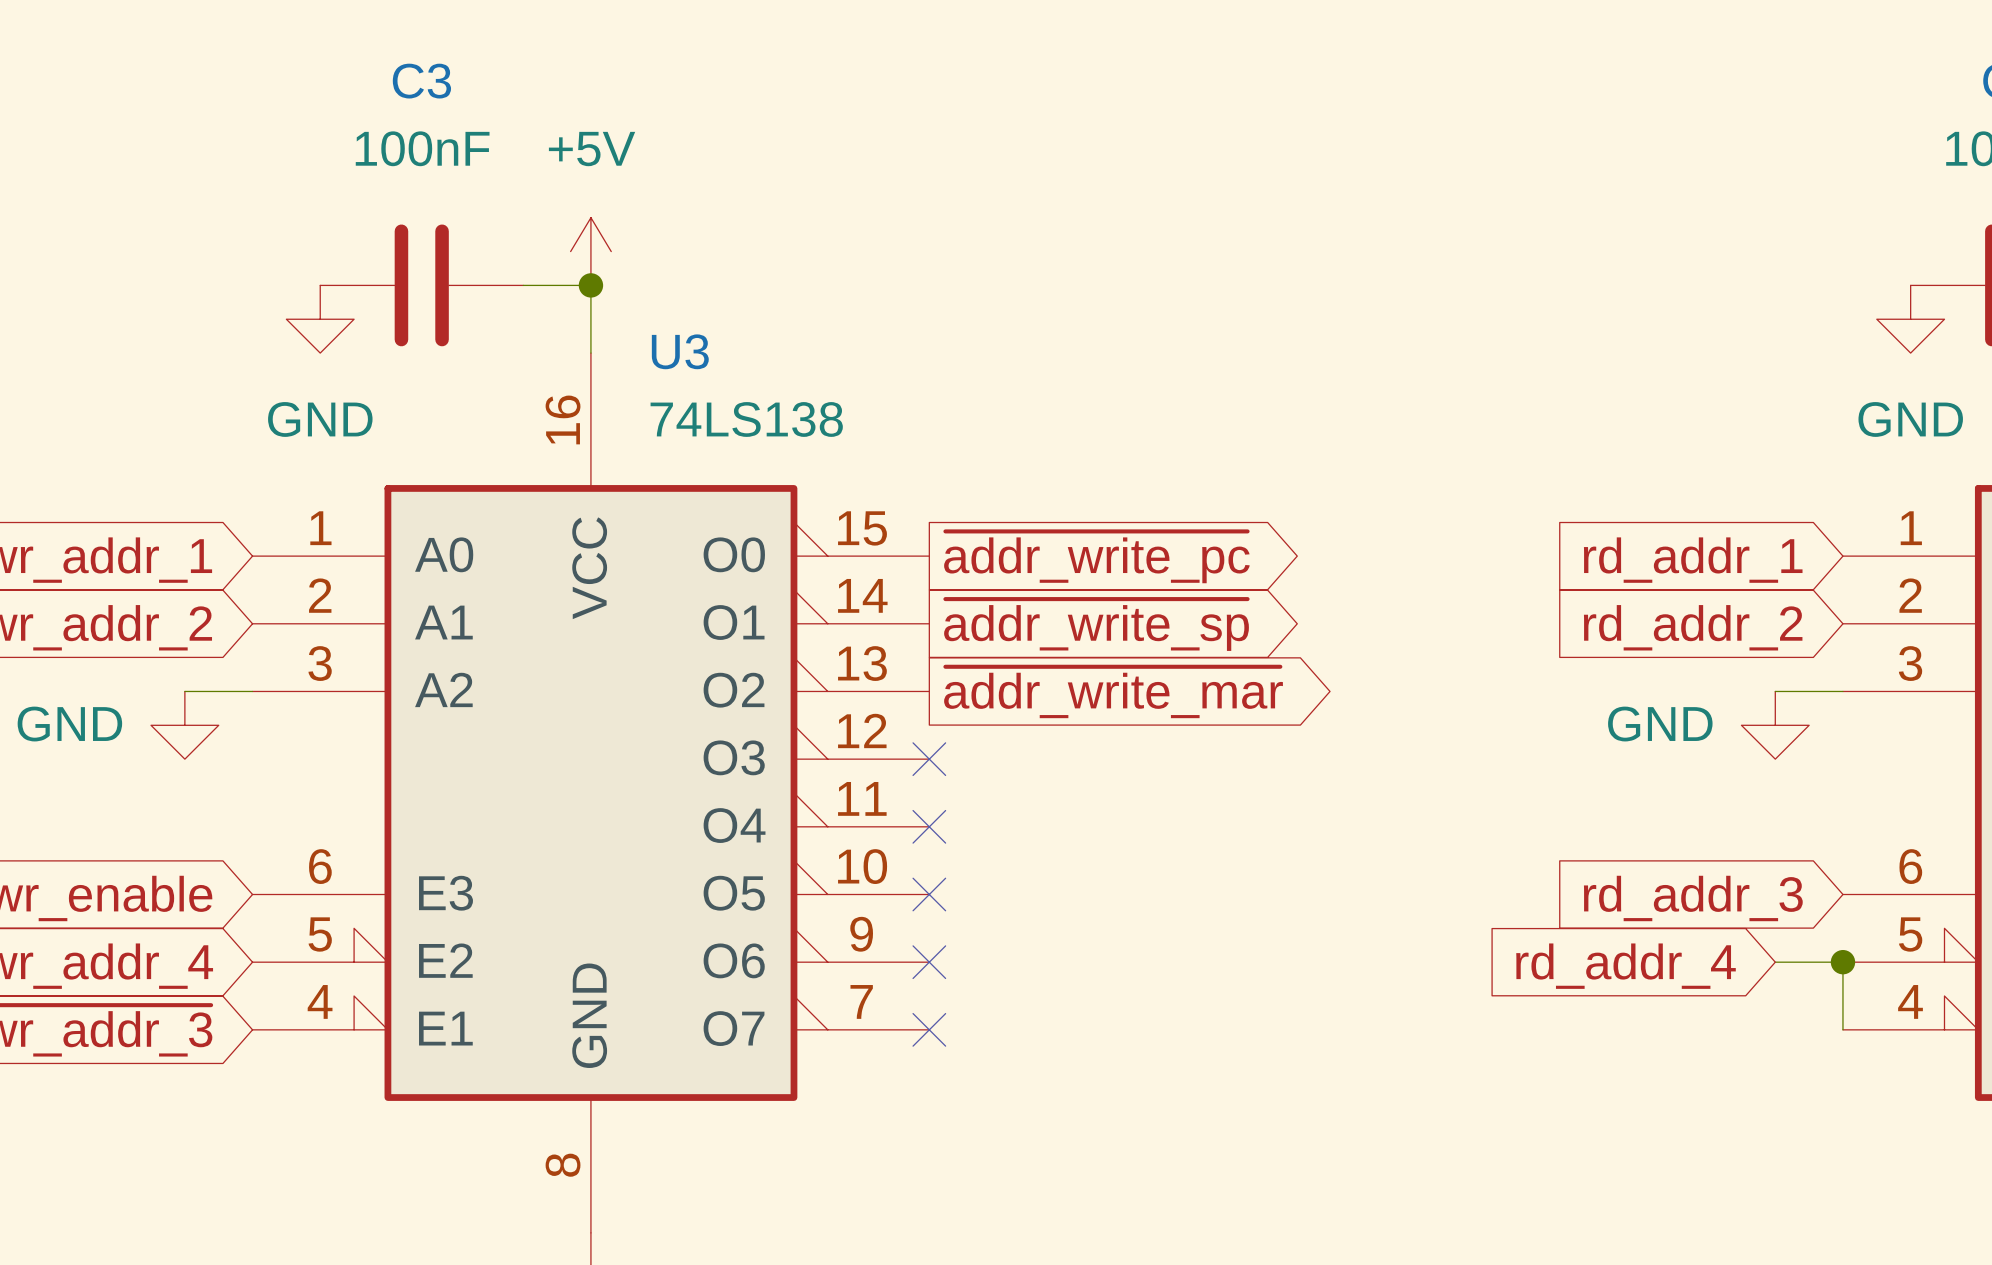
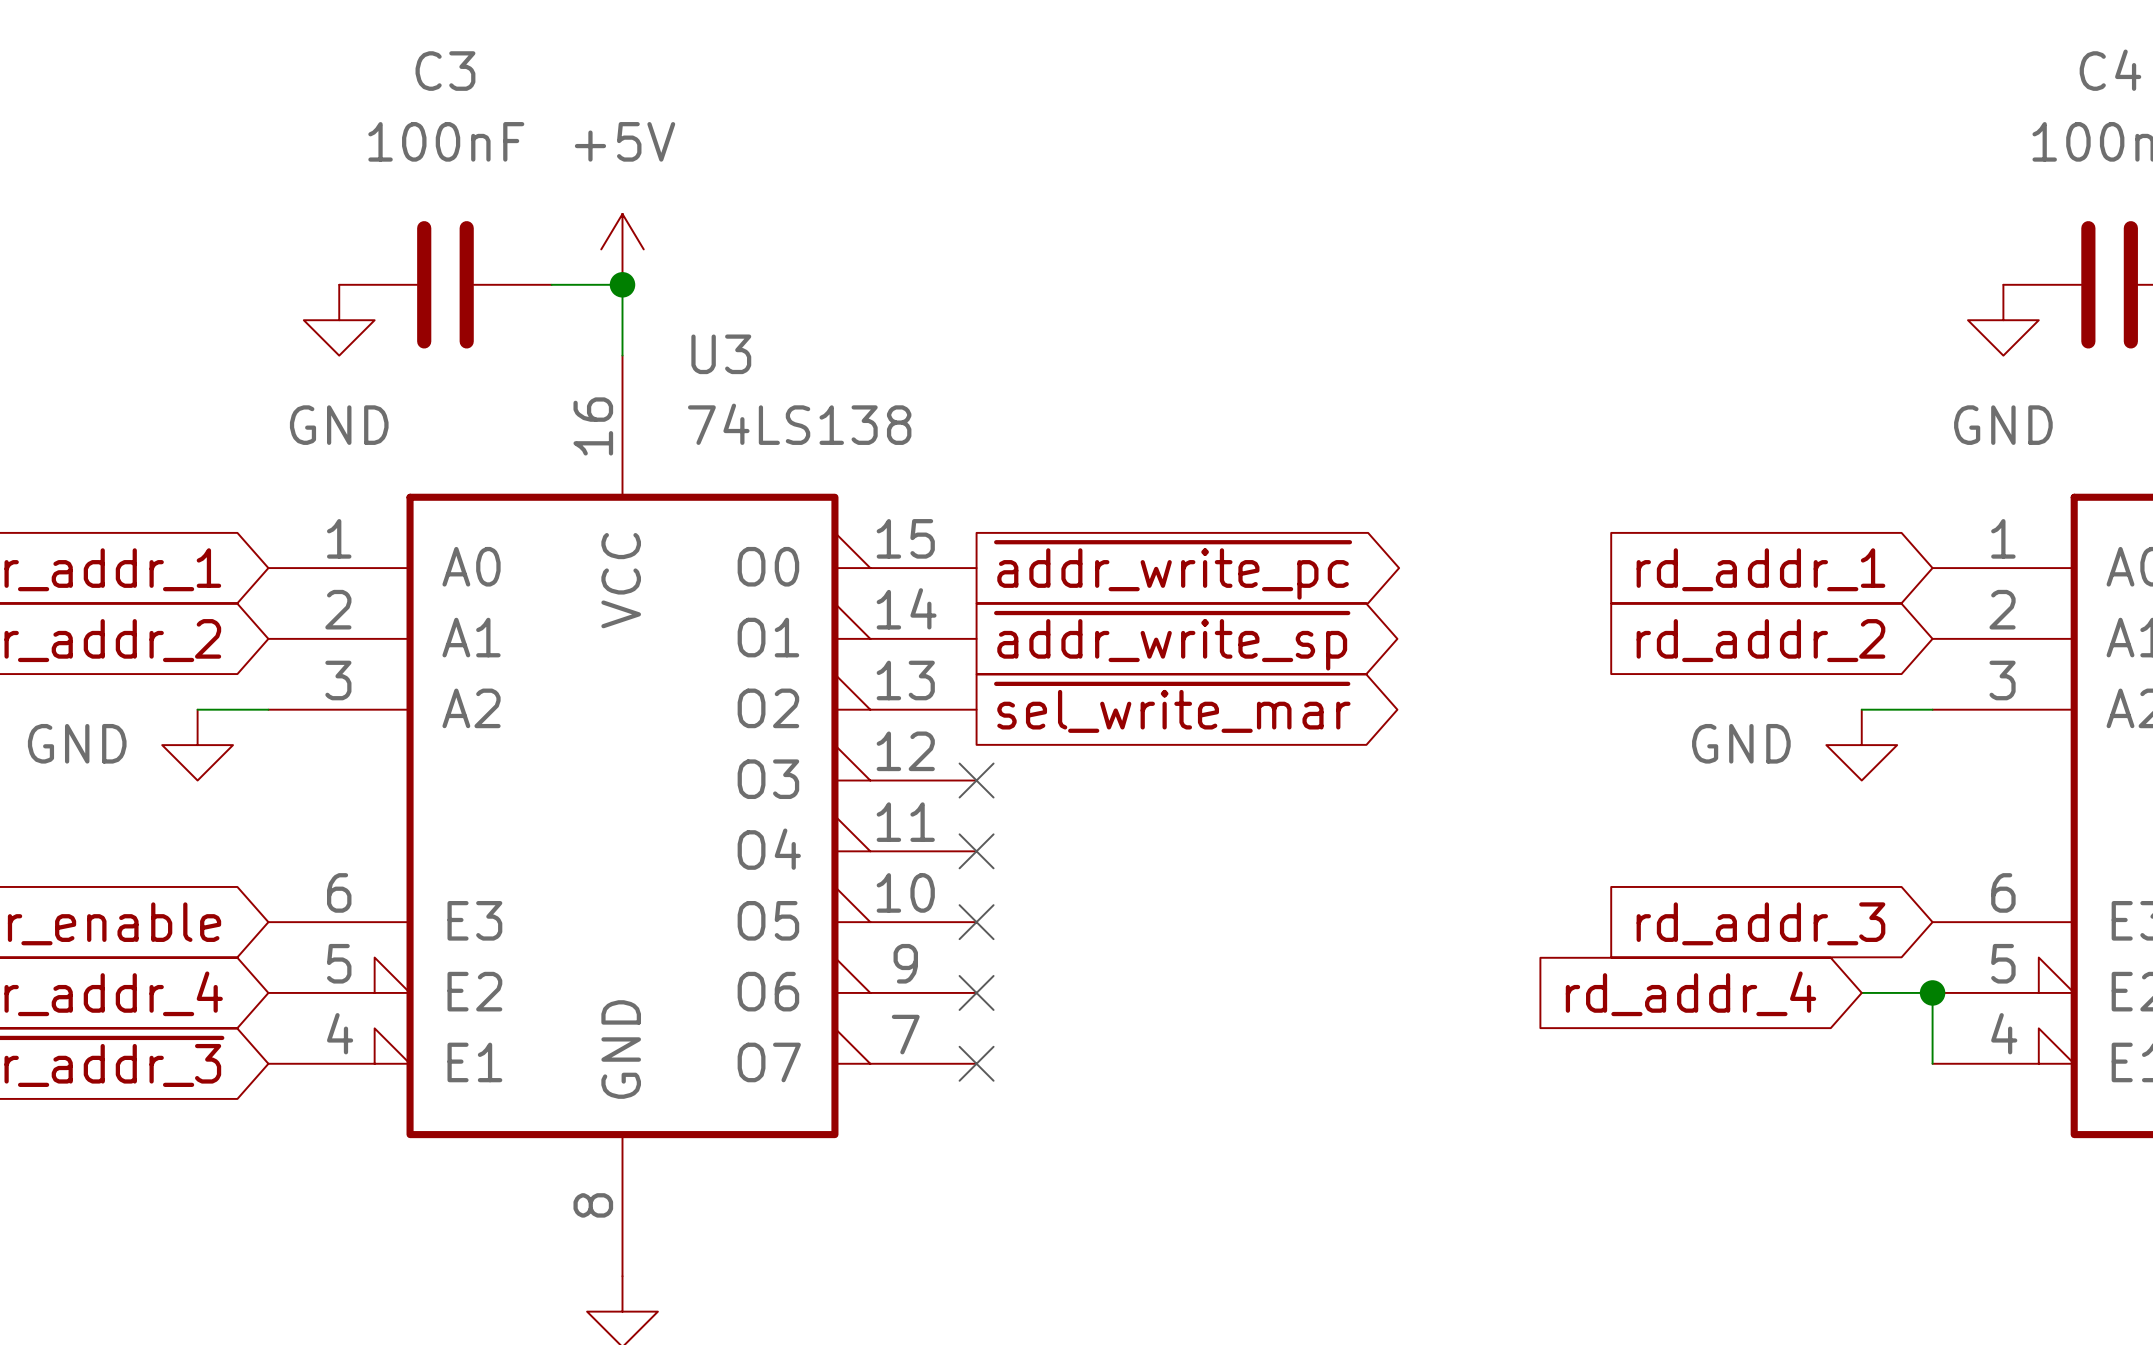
global label: ~{addr_write_mar} (1113, 692) -> ~{sel_write_mar} (1172, 707)

